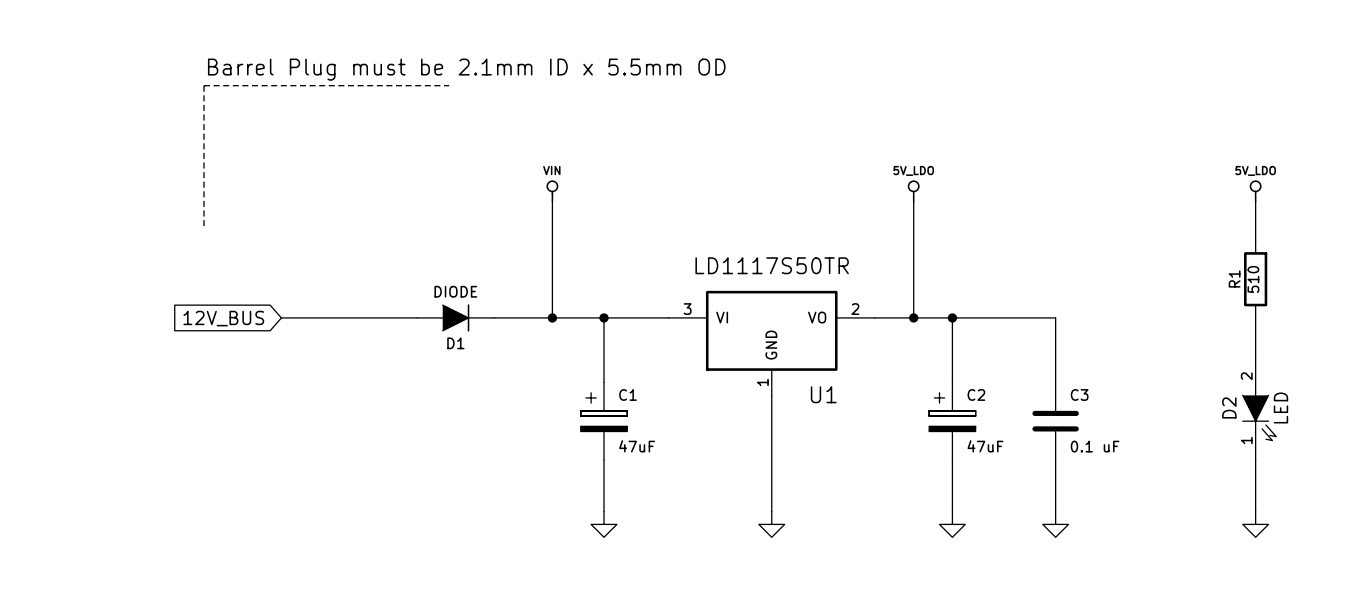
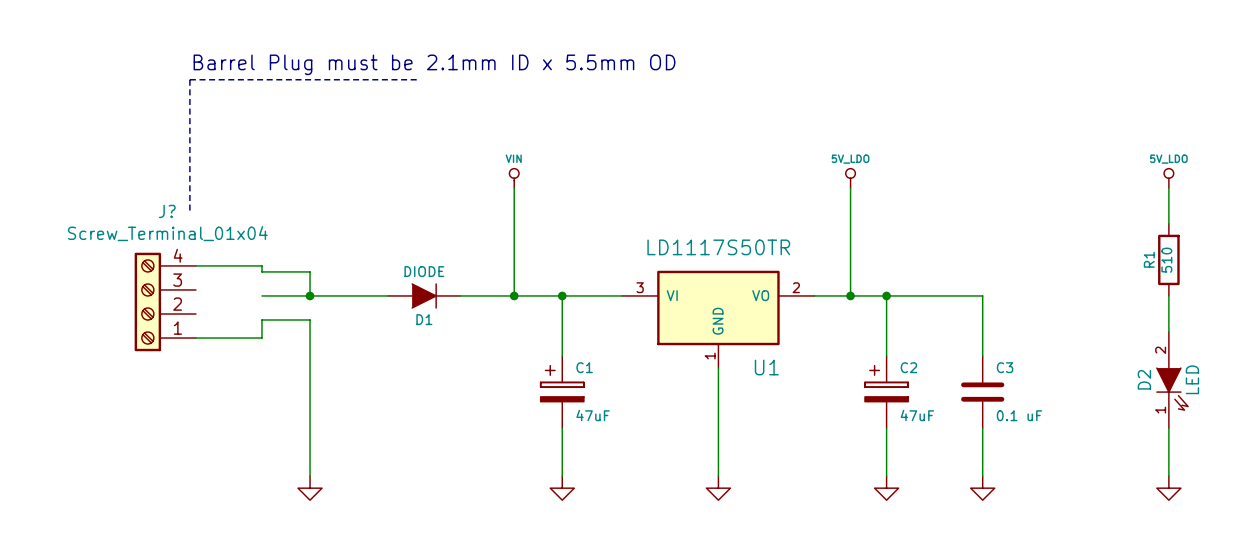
wire: none -> (195, 265) (261, 265) (261, 271) (310, 271) (310, 295)
junction: none -> (310, 295)
global label: 12V_BUS (223, 318) -> none
J?: none -> Screw_Terminal_01x04 (165, 301)
wire: none -> (195, 338) (261, 338) (261, 320) (310, 320) (310, 476)
power symbol: none -> (310, 488)

